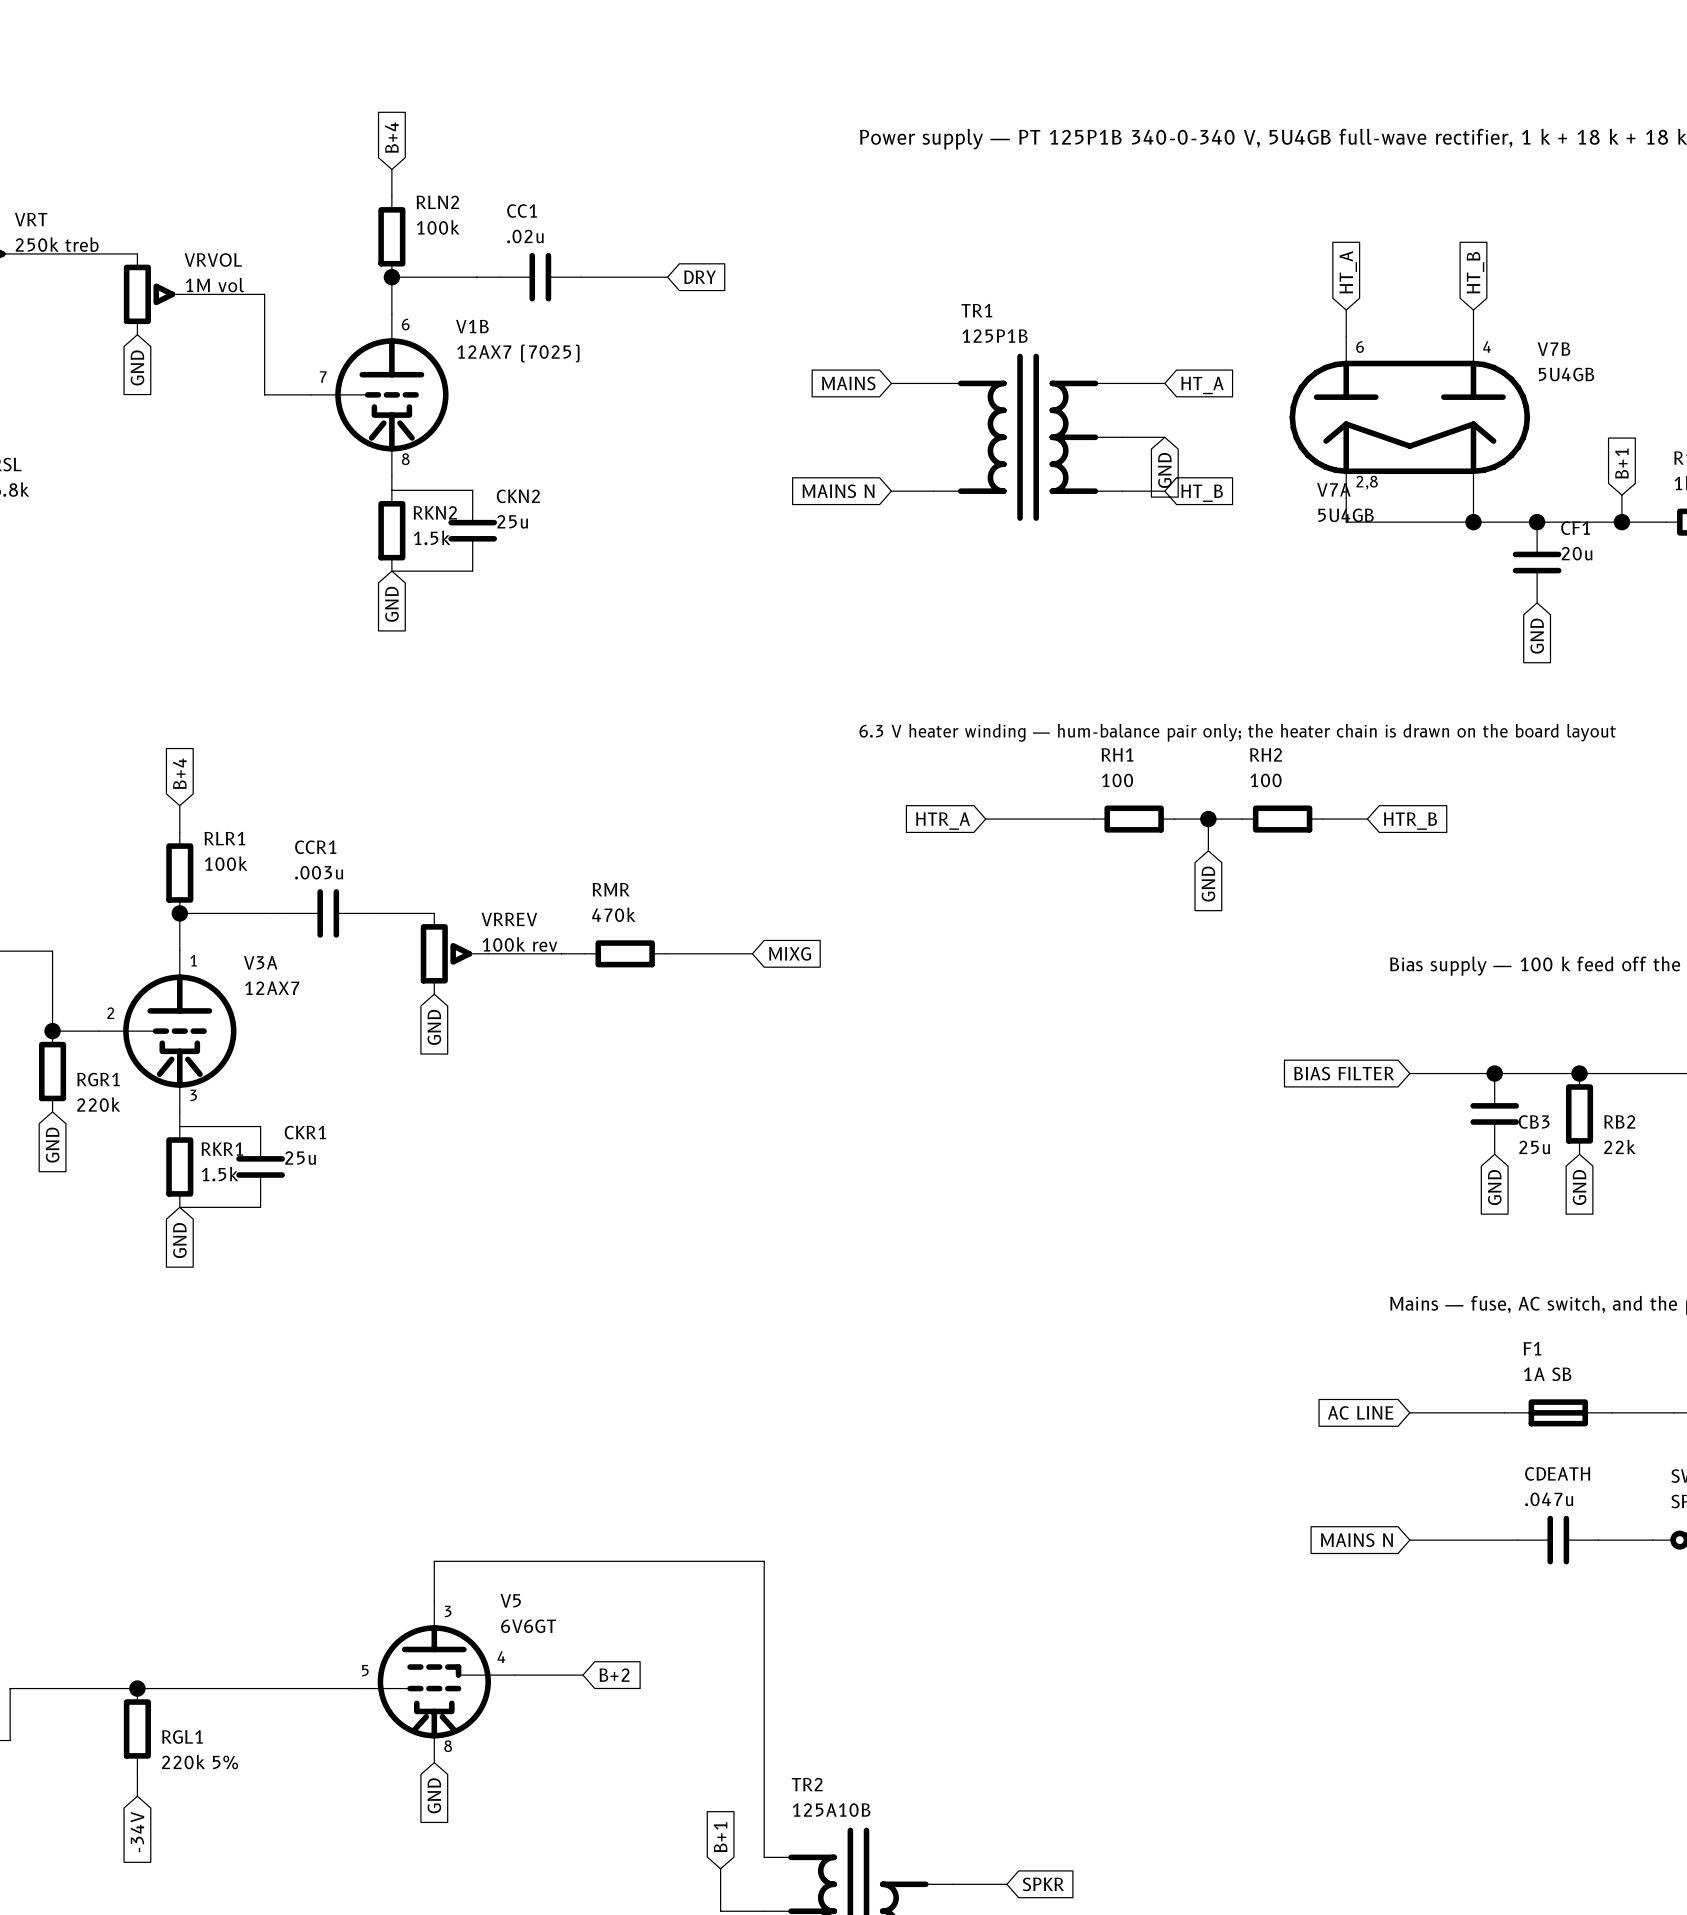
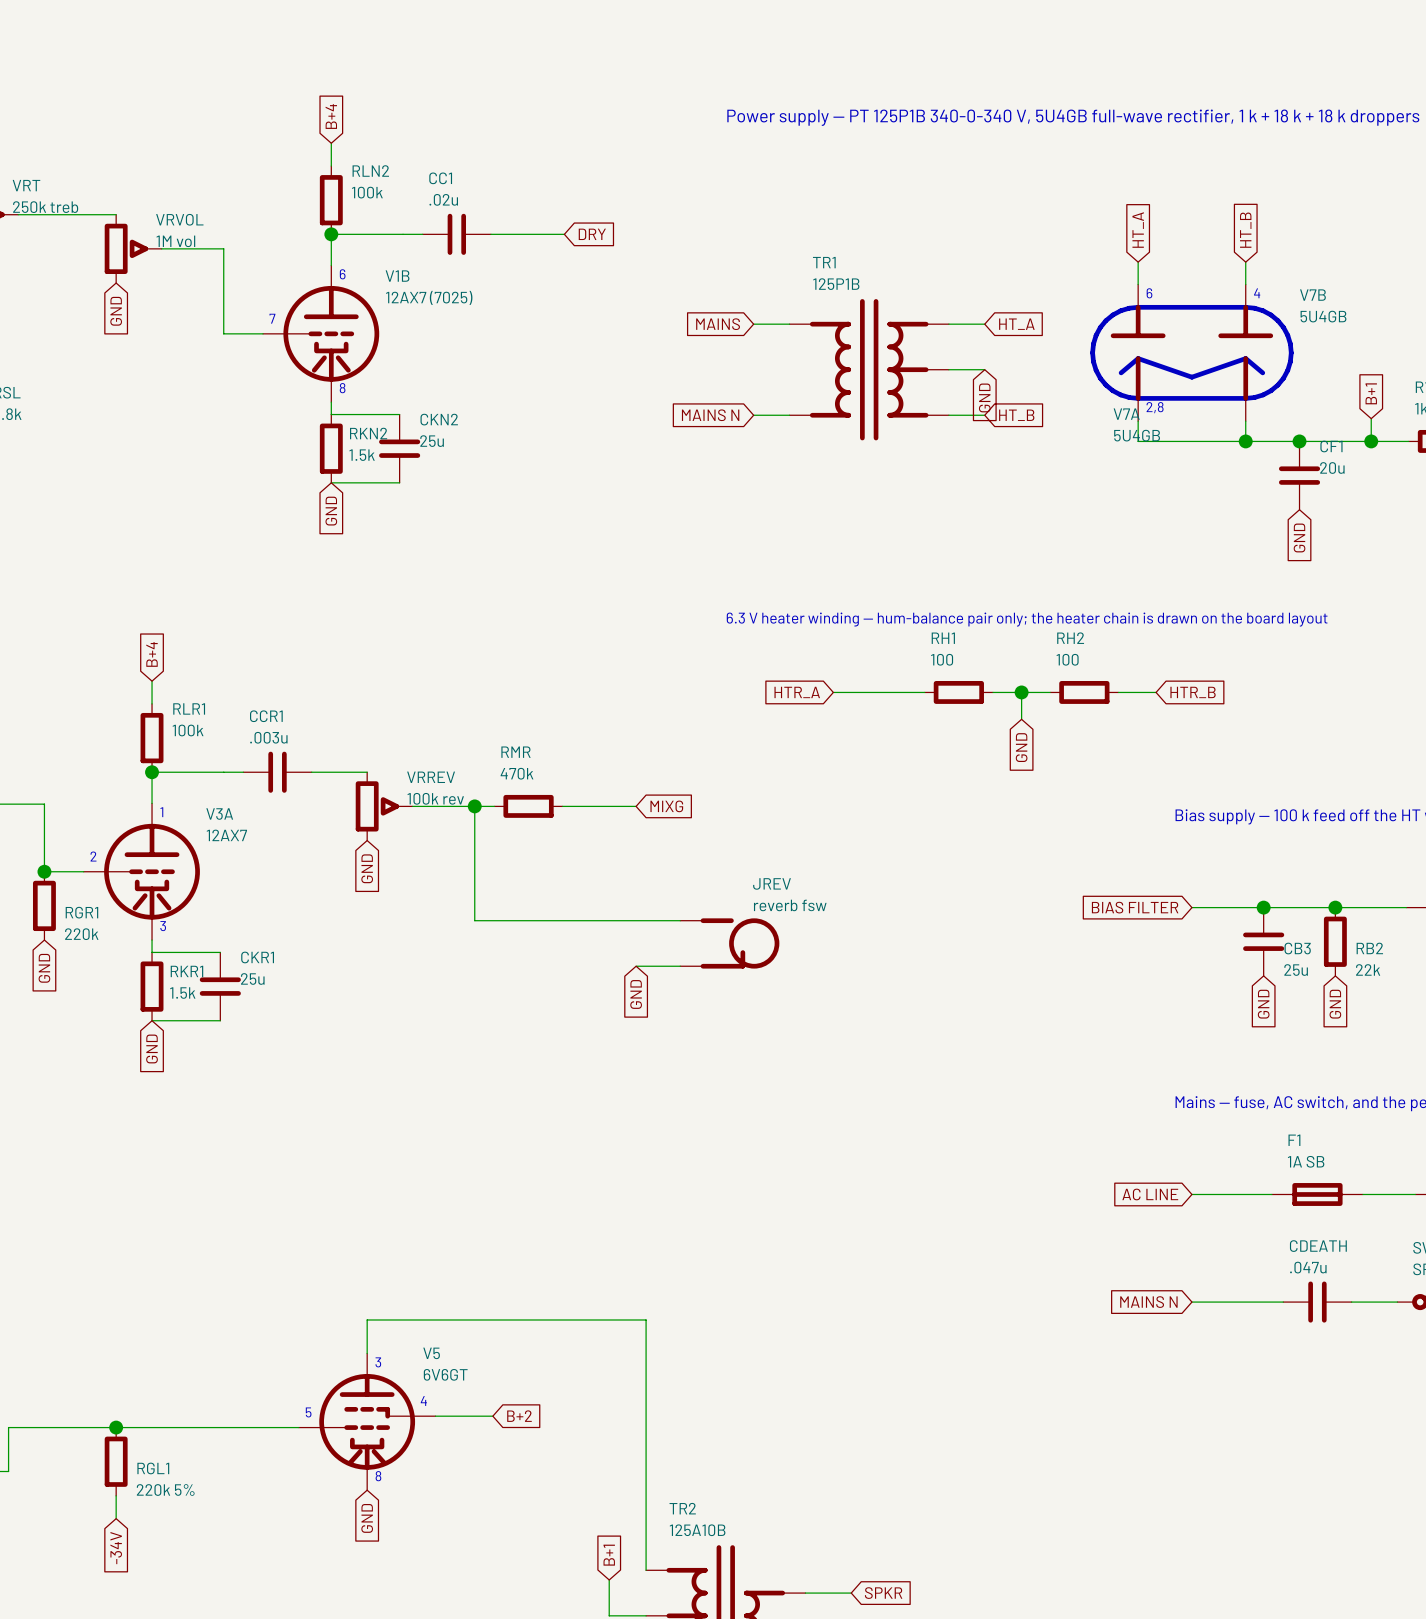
wire: none -> (474, 806) (474, 920) (680, 920)
junction: none -> (474, 806)
JREV: none -> reverb fsw (729, 943)
wire: none -> (636, 966) (680, 966)
global label: none -> GND (636, 994)

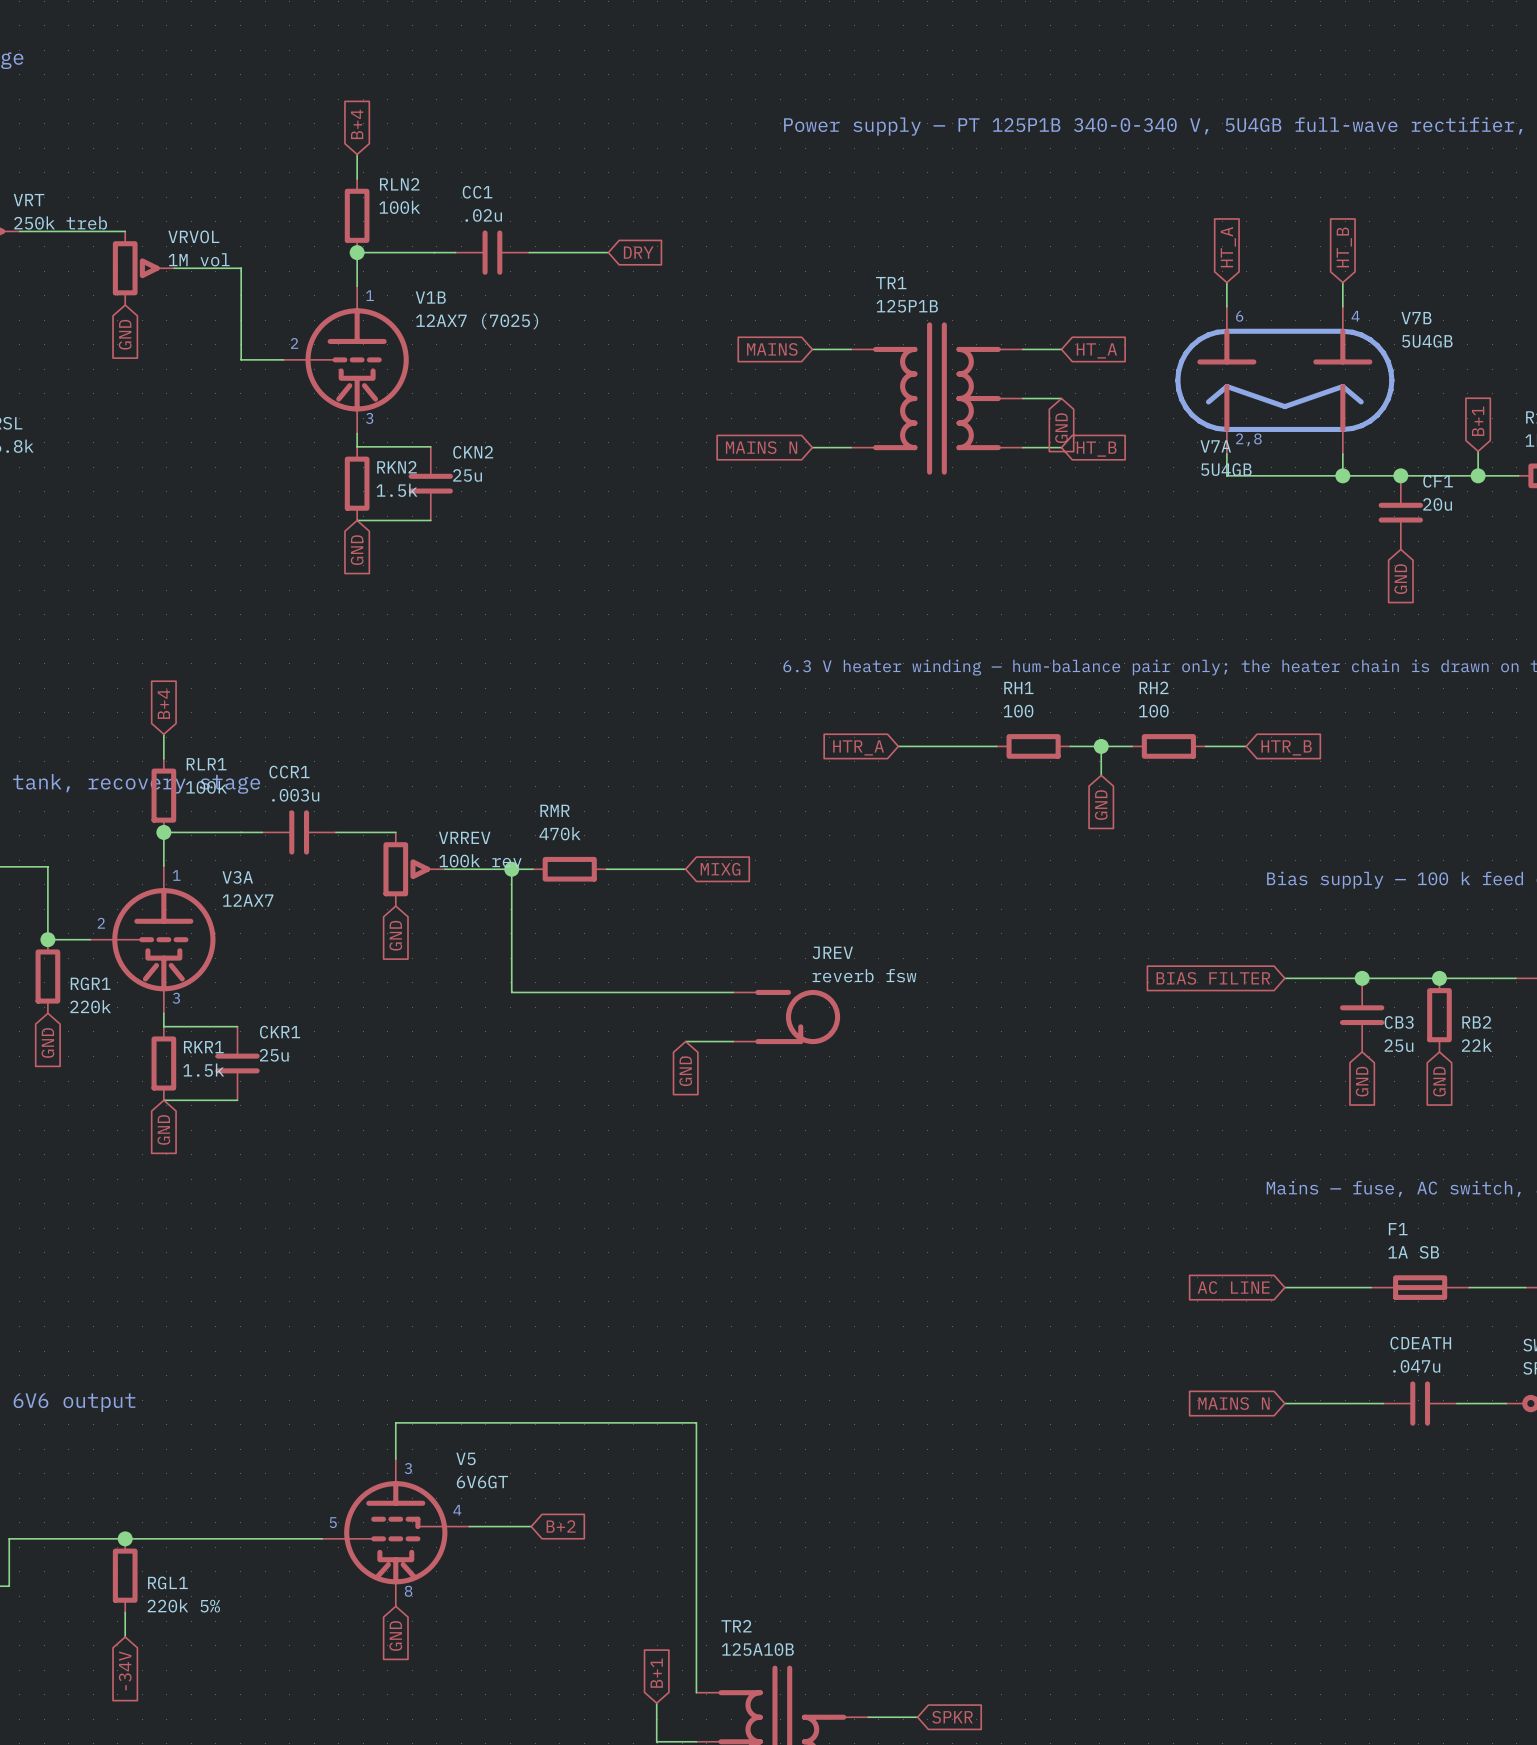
text: 6 (342, 274) -> 1 (369, 295)
text: 7 (272, 318) -> 2 (294, 343)
text: 8 (342, 388) -> 3 (369, 418)

